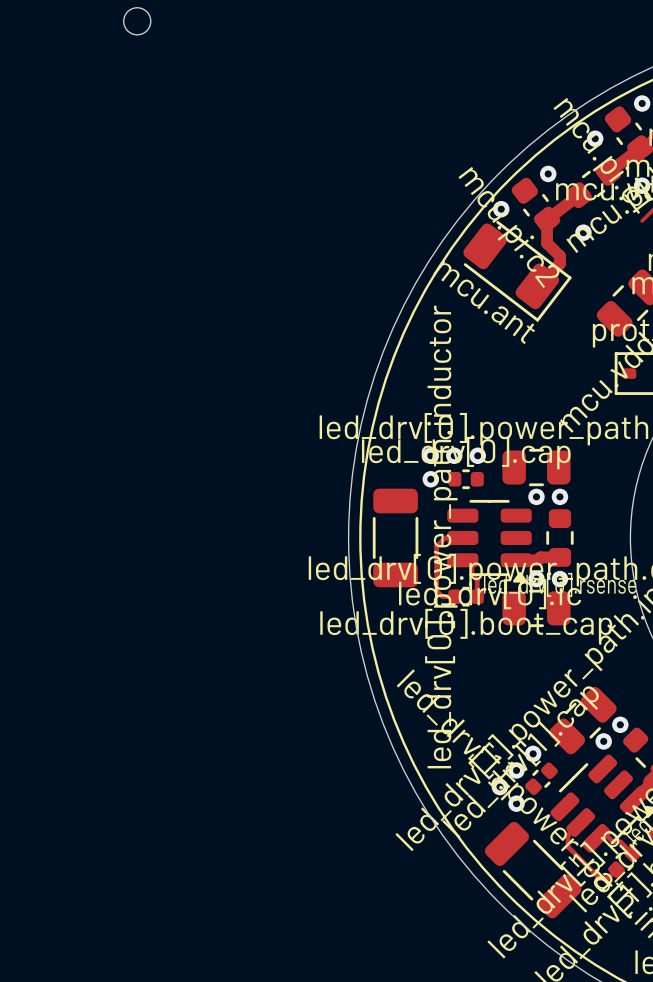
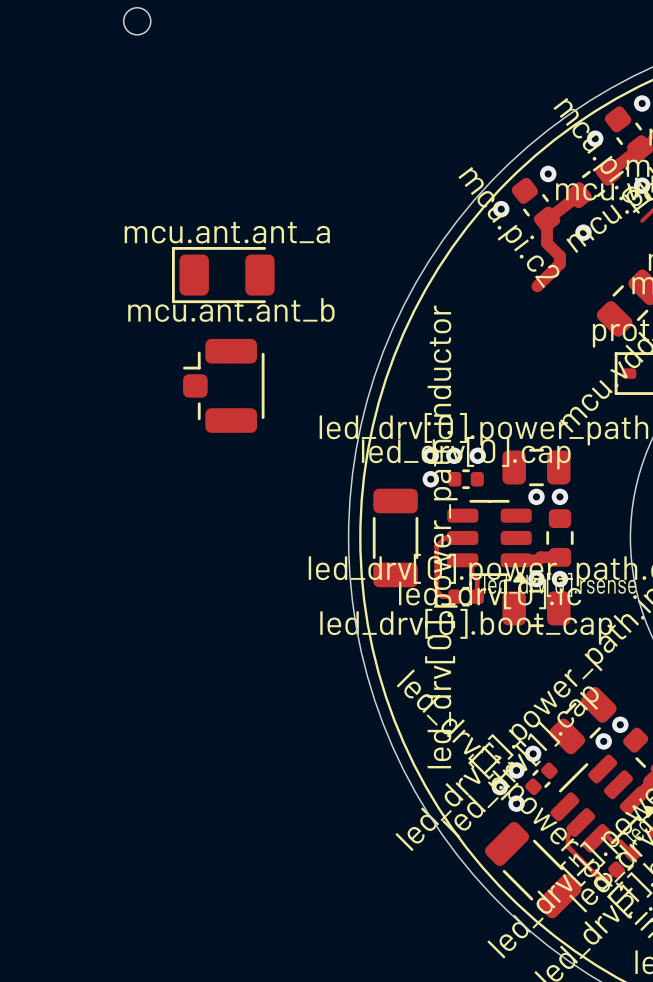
mcu.ant: (517, 271) -> none
mcu.ant.ant_a: none -> (223, 275)
mcu.ant.ant_b: none -> (223, 385)

